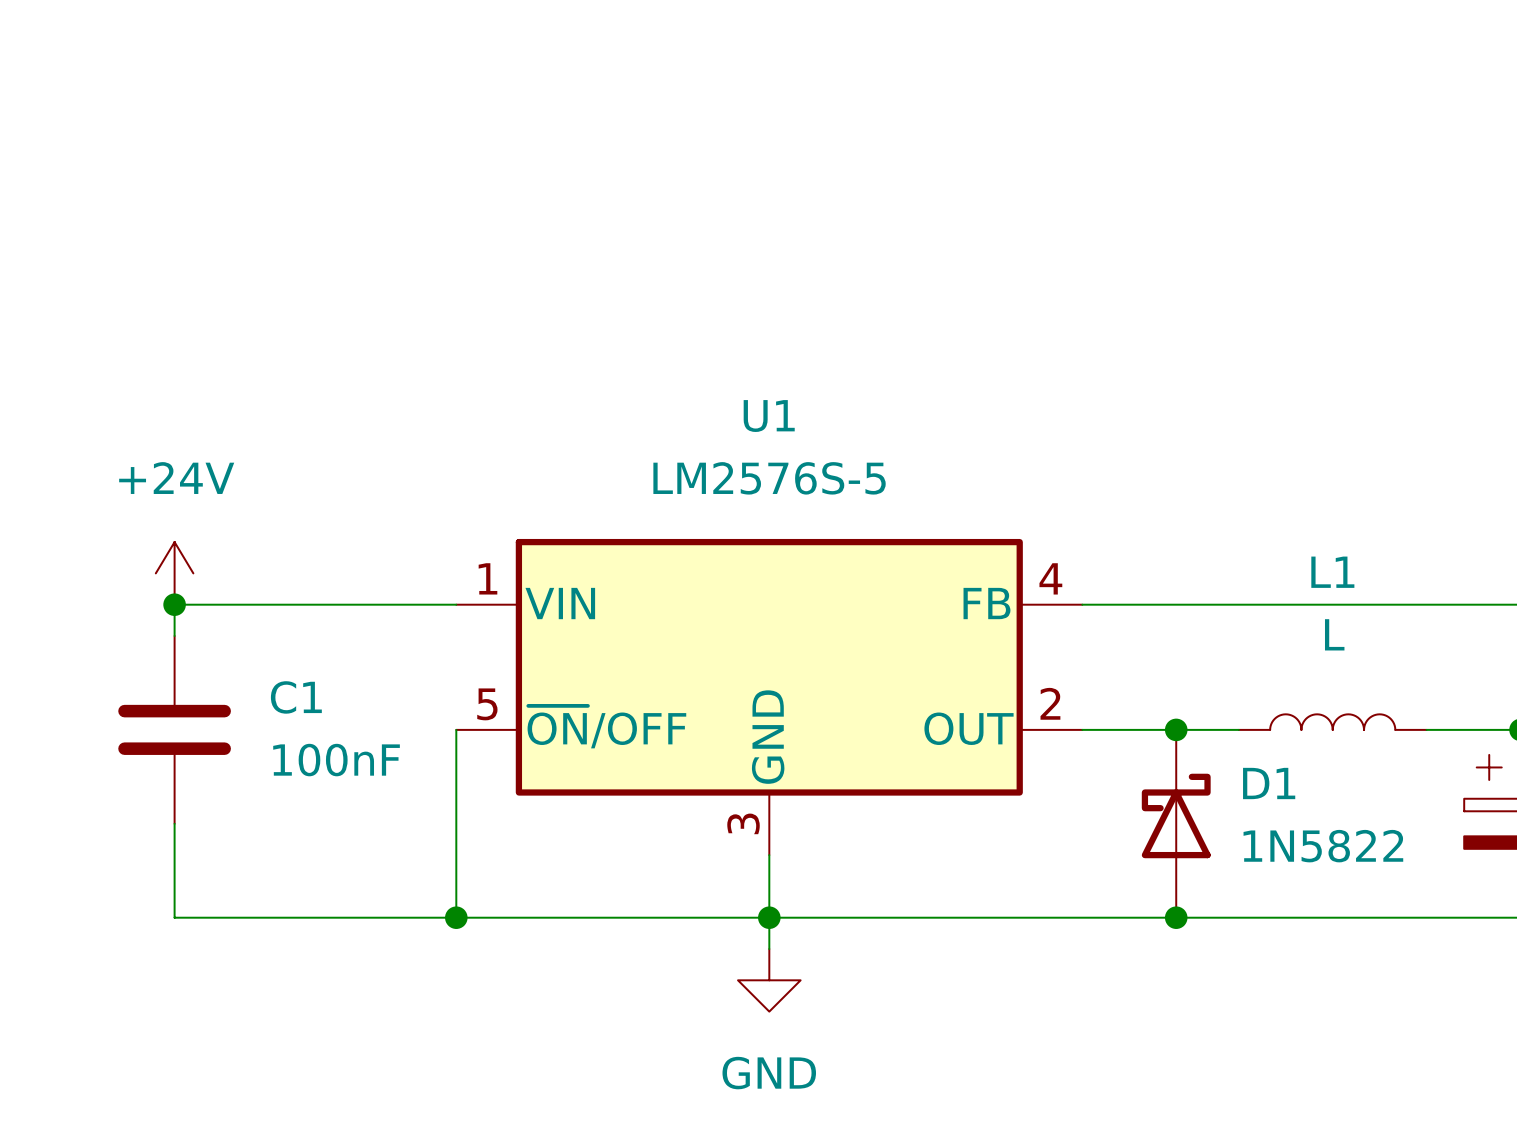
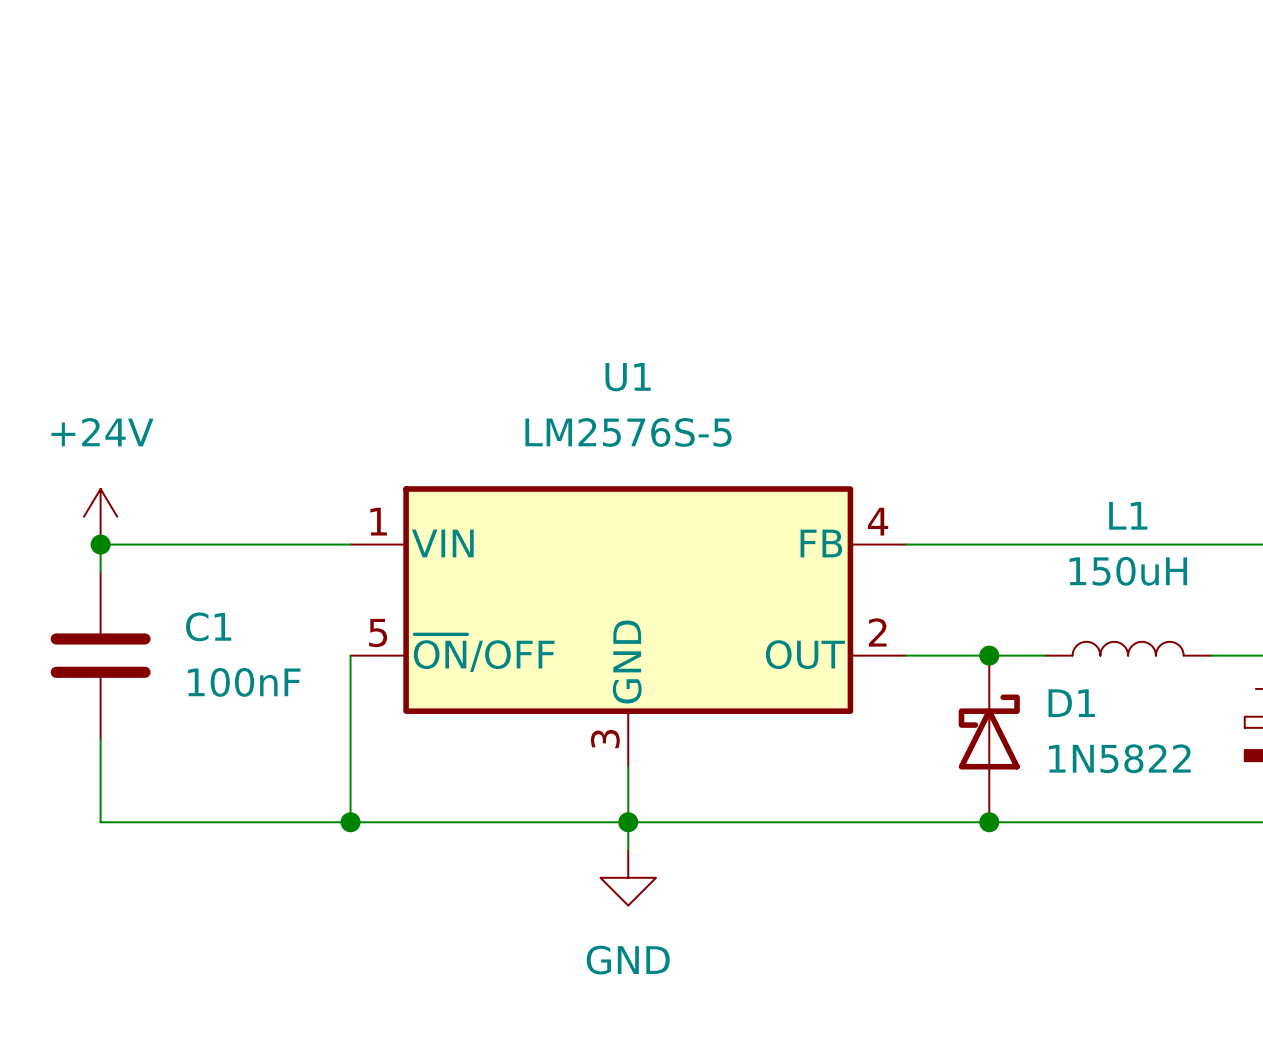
L1 value: L (1334, 634) -> 150uH (1128, 571)

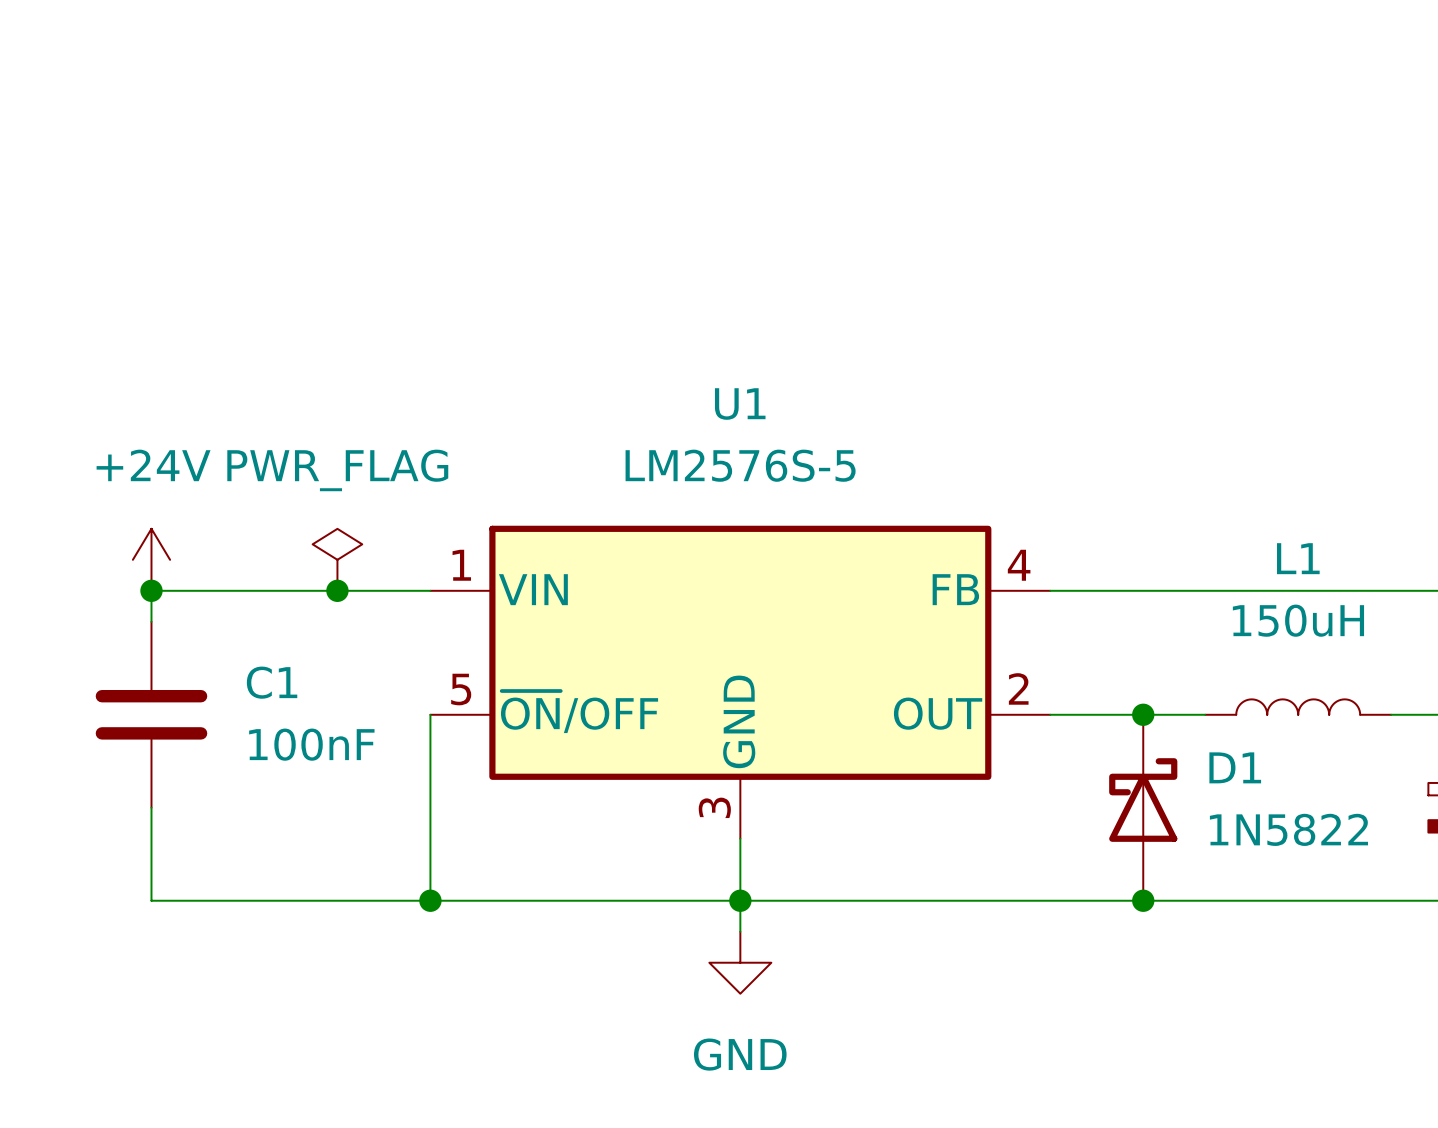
power symbol: none -> PWR_FLAG (337, 559)
junction: none -> (337, 590)

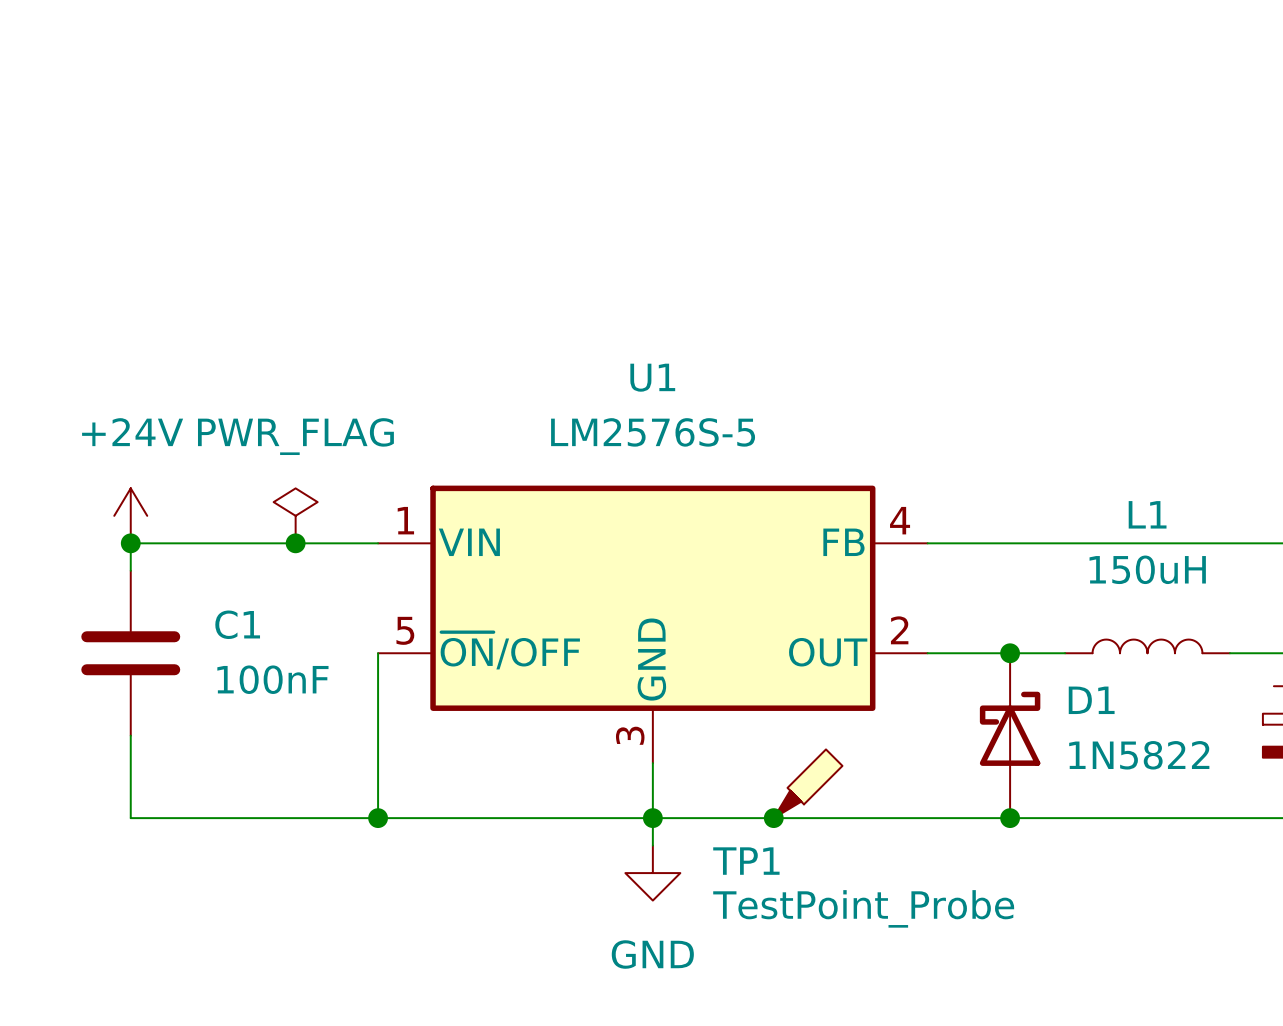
TP1: none -> TestPoint_Probe (808, 783)
junction: none -> (773, 818)

